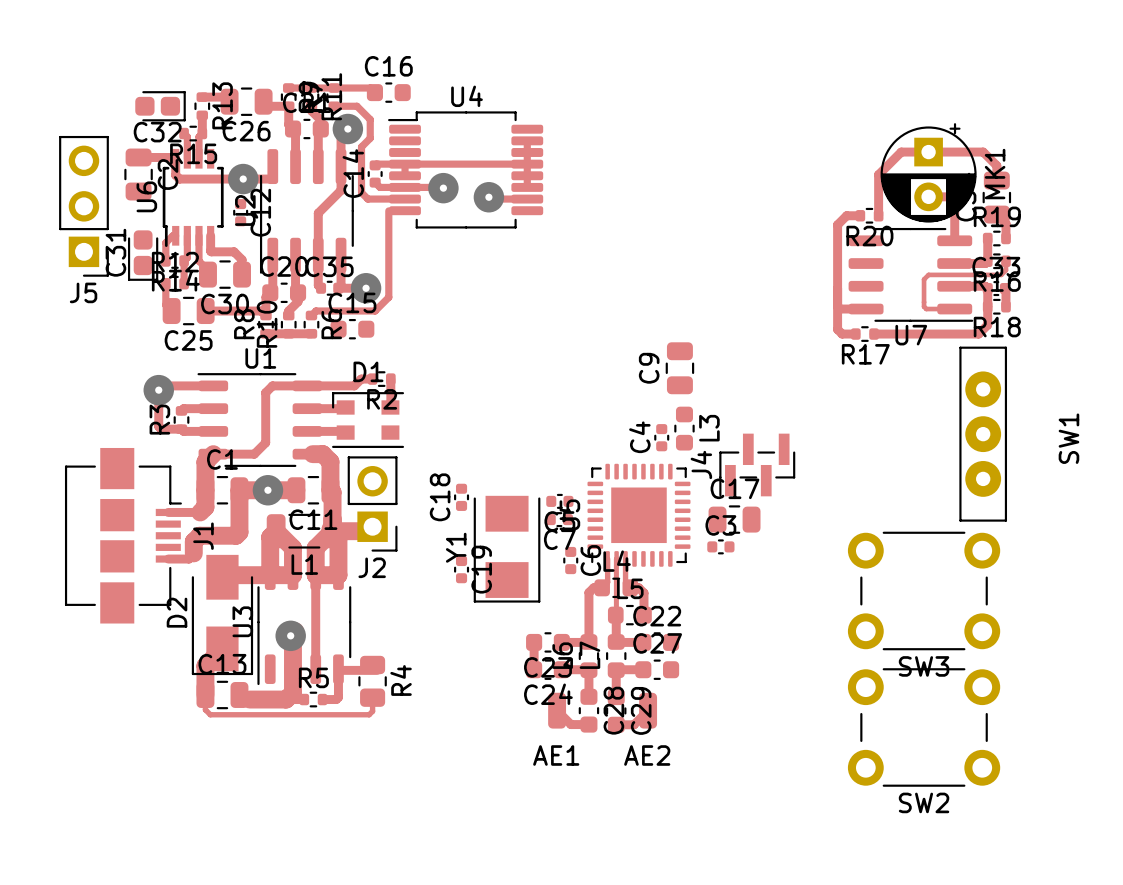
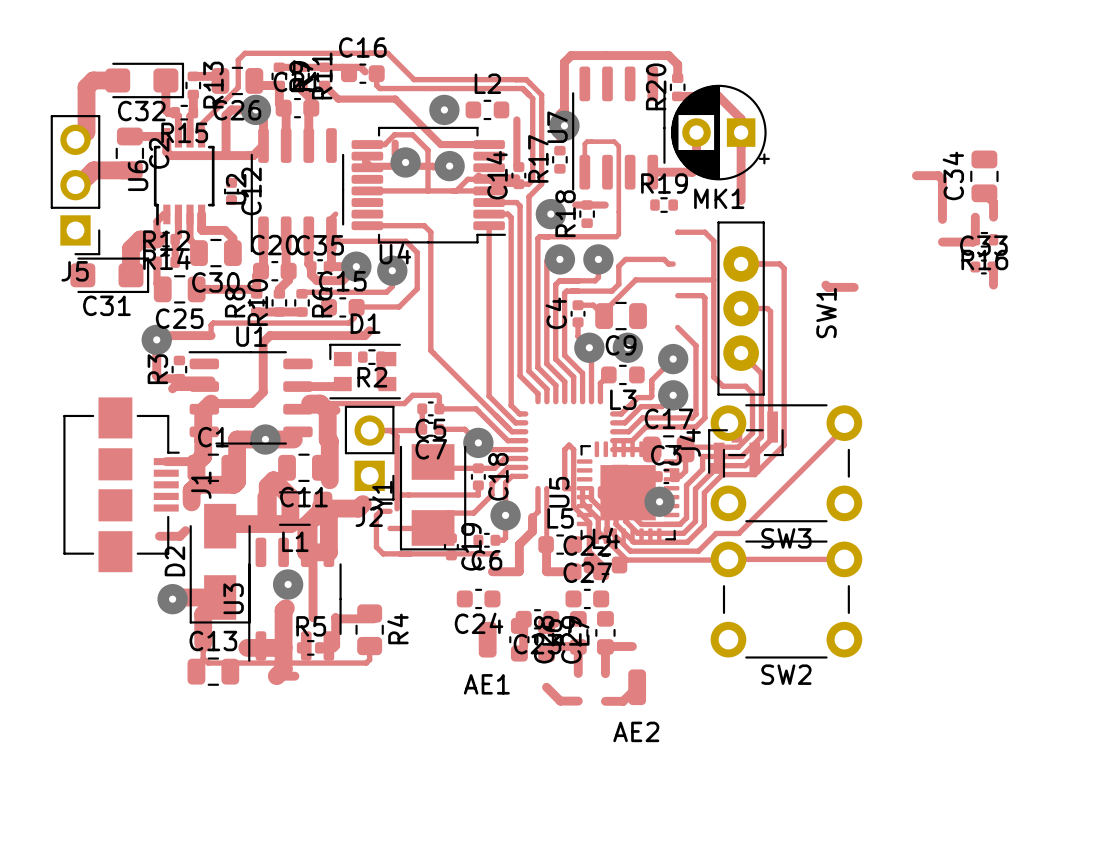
C32 footprint: [135, 91, 186, 122] -> [105, 62, 185, 99]
C16 position: (388, 92) -> (362, 73)
track: none -> (376, 73) (376, 85) (379, 88) (522, 88) (532, 98) (532, 180) (528, 184) (493, 184) (489, 179) (467, 179) (456, 190)
track: none -> (677, 78) (677, 64) (668, 55) (571, 55) (564, 62) (564, 109) (559, 114) (559, 137)
track: none -> (117, 80) (93, 80) (86, 87) (86, 132)
track: none -> (165, 80) (165, 109) (168, 112) (175, 112)
track: (334, 106) (356, 106) (370, 119) (370, 138) (361, 147) (361, 192) (367, 199) (405, 199) -> (324, 85) (338, 99) (395, 99) (440, 144) (489, 144)
track: none -> (677, 96) (718, 96) (741, 118) (741, 200)
track: (347, 129) (341, 135) (341, 190) (318, 213) (318, 255) -> none
via: (347, 129) -> none
via: none -> (255, 109)
via: none -> (444, 109)
L2: none -> (487, 109)
via: none -> (564, 125)
track: none -> (201, 128) (201, 137) (201, 124) (238, 87) (238, 60) (245, 53) (387, 53) (414, 79) (526, 79) (541, 94) (541, 184) (528, 196) (528, 371) (546, 389) (546, 401)
track: (527, 164) (375, 165) -> none
track: none -> (367, 144) (384, 144) (394, 134) (412, 134) (428, 150) (428, 190)
track: none -> (696, 146) (696, 168) (692, 172) (652, 172)
U4 rotation: 0° (465, 169) -> 180° (428, 185)
track: (272, 171) (272, 176) (270, 179) (179, 179) (175, 173) -> (226, 155) (226, 115) (231, 109) (255, 109) (263, 117) (263, 145) (253, 155) (170, 155) (166, 152)
MK1 rotation: 0° (928, 172) -> 90° clockwise (720, 132)
MK1 position: (928, 172) -> (720, 132)
C14 position: (375, 174) -> (518, 175)
via: (243, 179) -> none
track: (996, 180) (996, 165) (983, 152) (901, 152) (878, 174) (878, 215) -> none
via: none -> (405, 162)
via: none -> (449, 166)
via: (443, 188) -> none
track: none -> (131, 170) (93, 170) (86, 177)
track: none -> (584, 172) (584, 143) (587, 141) (614, 141) (618, 146) (618, 234) (616, 236) (539, 236) (537, 238) (537, 367) (555, 385) (555, 401)
via: (488, 197) -> none
track: none -> (495, 184) (489, 190) (367, 190)
track: (388, 210) (388, 297) (375, 310) (315, 310) (313, 313) -> (392, 270) (392, 286) (386, 292) (303, 292)
track: (860, 215) (846, 215) (837, 224) (837, 329) (842, 334) (855, 334) -> none
R20 rotation: 0° (869, 215) -> 90° clockwise (677, 87)
R20 position: (869, 215) -> (677, 87)
track: none -> (489, 202) (516, 202) (520, 205) (520, 375) (537, 393) (537, 401)
track: none -> (575, 205) (605, 205)
C31 footprint: [127, 230, 159, 281] -> [70, 257, 150, 294]
track: none -> (335, 214) (331, 218) (331, 233) (338, 241) (405, 241) (417, 252) (417, 288) (399, 306) (354, 306) (354, 318) (349, 323) (213, 323) (211, 325) (211, 335) (160, 335) (156, 339) (156, 376) (159, 378) (211, 380)
track: none -> (489, 214) (507, 214) (511, 217) (511, 405) (519, 413) (525, 413)
via: none -> (550, 214)
R19 position: (996, 238) -> (664, 205)
track: none -> (367, 225) (424, 225) (430, 232) (430, 350) (512, 431) (525, 431)
track: none -> (489, 225) (489, 396) (515, 422) (525, 422)
C31 name position: C31 (115, 252) -> C31 (106, 305)
track: none -> (677, 232) (704, 232) (713, 241) (713, 377) (722, 386) (745, 386) (752, 393) (752, 433) (738, 447) (687, 447) (685, 449) (685, 471) (680, 476)
track: none -> (157, 239) (140, 239) (130, 248) (130, 275)
track: (1005, 261) (1005, 270) (1001, 274) (928, 274) (924, 279) (924, 306) (926, 309) (954, 309) -> none
U7 rotation: 0° (910, 274) -> 90° clockwise (618, 128)
U7 position: (910, 274) -> (618, 128)
track: none -> (553, 259) (546, 261) (546, 363) (564, 381) (564, 401)
via: none -> (559, 259)
track: none -> (598, 259) (598, 277) (595, 280) (559, 280) (555, 284) (555, 359) (573, 377) (573, 401)
via: none -> (598, 259)
track: none -> (673, 264) (668, 264) (664, 259) (625, 259) (618, 266) (618, 284) (612, 291) (566, 291) (564, 293) (564, 355) (582, 373) (582, 401)
track: none -> (729, 263) (779, 263) (784, 268) (784, 445) (754, 474) (722, 474) (704, 492) (704, 525) (687, 542) (634, 542) (616, 524) (616, 511) (600, 495) (600, 488)
track: (954, 286) (985, 286) (987, 288) (987, 324) (978, 334) (874, 334) -> none
track: none -> (311, 266) (311, 275) (317, 280) (342, 280) (352, 270)
via: none -> (392, 270)
track: none -> (713, 279) (635, 279) (604, 311) (604, 316)
R18 rotation: 0° (996, 306) -> 90° clockwise (587, 214)
R18 position: (996, 306) -> (587, 214)
track: none -> (677, 295) (702, 295) (704, 297) (704, 417) (695, 427) (645, 427) (632, 440) (612, 440)
track: none -> (578, 305) (593, 305) (601, 313)
track: none -> (729, 308) (767, 308) (770, 311) (770, 440) (745, 465) (711, 465) (711, 473) (695, 489) (695, 521) (683, 533) (637, 533) (625, 521) (625, 479) (622, 476) (612, 476)
R17 rotation: 0° (864, 334) -> 90° clockwise (559, 159)
R17 position: (864, 334) -> (559, 159)
track: none -> (578, 322) (578, 336) (591, 349) (591, 401)
track: none -> (677, 327) (695, 345) (695, 414) (692, 417) (642, 417) (628, 431) (612, 431)
track: none -> (369, 330) (364, 335) (270, 335) (263, 342) (263, 392) (251, 403) (216, 403)
C9 name position: C9 (649, 368) -> C9 (621, 345)
C9 rotation: 0° (679, 368) -> 90° clockwise (621, 316)
C9 position: (679, 368) -> (621, 316)
via: none -> (589, 347)
via: none -> (627, 347)
track: none -> (741, 353) (761, 373) (761, 436) (741, 456) (702, 456) (702, 469) (686, 485) (686, 517) (679, 524) (641, 524) (634, 517) (634, 475) (626, 467) (612, 467)
track: (372, 379) (361, 379) (354, 385) (272, 385) (265, 392) (265, 442) (254, 454) (218, 454) -> none
track: none -> (673, 359) (651, 380) (650, 397) (637, 397) (621, 413) (612, 413)
via: none -> (673, 359)
track: (213, 385) (163, 385) (158, 390) (158, 426) (161, 429) (213, 431) -> none
via position: (158, 390) -> (156, 339)
track: none -> (608, 374) (600, 383) (600, 401)
track: none -> (673, 395) (661, 406) (641, 406) (624, 422) (612, 422)
via: none -> (673, 395)
R3 position: (181, 420) -> (179, 369)
D1 position: (368, 420) -> (365, 371)
track: none -> (304, 403) (404, 403) (412, 395) (437, 395) (439, 397) (439, 408) (476, 408) (507, 440) (525, 440)
L3 rotation: 0° (684, 428) -> 90° clockwise (622, 374)
L3 position: (684, 428) -> (622, 374)
track: none -> (422, 408) (421, 430) (369, 430)
SW1 position: (983, 434) -> (741, 308)
C4 position: (661, 437) -> (578, 313)
track: none -> (844, 423) (844, 427) (738, 533) (716, 533) (698, 551) (630, 551) (607, 527) (607, 515) (591, 499) (591, 488)
track: none -> (439, 429) (464, 429) (485, 449) (525, 449)
track: none -> (391, 430) (397, 436) (397, 508)
track: (213, 454) (205, 462) (205, 507) (200, 512) (168, 512) -> (211, 403) (203, 411) (203, 456) (198, 461) (166, 461)
track: (312, 454) (322, 454) (330, 461) (332, 531) -> (310, 403) (320, 403) (327, 411) (329, 480)
via: none -> (478, 442)
track: none -> (612, 449) (647, 449)
track: none -> (525, 458) (504, 458) (494, 468) (439, 468) (433, 461)
track: none -> (525, 467) (508, 467) (491, 483) (491, 494) (473, 513) (447, 513) (432, 528) (390, 528)
via position: (267, 490) -> (265, 439)
track: (296, 490) (239, 490) (239, 532) (236, 535) (199, 535) (193, 541) (193, 553) -> (293, 439) (237, 439) (237, 481) (233, 484) (197, 484) (191, 490) (191, 502)
C18 name position: C18 (440, 497) -> C18 (498, 476)
C18 position: (461, 497) -> (478, 476)
track: none -> (525, 476) (511, 476) (505, 482) (505, 538) (503, 540) (495, 540)
C5 position: (559, 501) -> (430, 408)
J2 position: (372, 503) -> (369, 453)
track: none -> (478, 485) (478, 494) (401, 494) (397, 499)
track: none -> (537, 488) (537, 511) (532, 517) (532, 531) (519, 544) (519, 571) (492, 571)
track: none -> (573, 488) (564, 488) (564, 449) (569, 445) (573, 449) (573, 506) (589, 522) (589, 551) (601, 563) (601, 571)
track: none -> (582, 488) (582, 503) (598, 518) (598, 531) (626, 560) (844, 559)
C7 position: (559, 519) -> (430, 429)
C17 position: (734, 519) -> (668, 449)
via: none -> (659, 501)
track: none -> (390, 511) (380, 511) (376, 515) (376, 547) (383, 553) (496, 553)
J1 position: (123, 535) -> (121, 484)
via: none -> (505, 515)
C3 position: (720, 546) -> (666, 476)
Y1 position: (507, 549) -> (433, 497)
track: (607, 558) (607, 582) (602, 587) (593, 587) (588, 592) (588, 641) (561, 642) -> none
track: (625, 558) (625, 583) (630, 587) (638, 587) (643, 593) (643, 615) -> none
track: (616, 559) (616, 641) (643, 642) -> (546, 488) (546, 571) (573, 571)
C6 rotation: 0° (570, 560) -> 90° clockwise (486, 540)
C6 position: (570, 560) -> (486, 540)
track: (222, 572) (224, 575) (292, 575) (292, 548) (276, 531) (270, 537) (270, 575) -> (220, 521) (222, 524) (290, 524) (290, 497) (273, 480) (267, 486) (267, 524)
track: (315, 575) (315, 669) -> (313, 524) (313, 617)
SW3 position: (924, 590) -> (786, 463)
D2 position: (222, 614) -> (220, 563)
L5 position: (629, 615) -> (560, 544)
track: none -> (172, 599) (174, 597) (220, 597) (203, 614) (203, 658) (208, 663) (366, 663) (369, 659) (369, 646)
via: none -> (172, 599)
via position: (290, 635) -> (288, 584)
C22 position: (657, 642) -> (587, 571)
track: (222, 648) (205, 665) (205, 709) (210, 714) (369, 714) (372, 711) (372, 697) -> none
C24 position: (547, 669) -> (478, 598)
C27 position: (657, 669) -> (587, 598)
track: (377, 670) (338, 669) (338, 697) (336, 699) (322, 699) -> (374, 618) (335, 617) (335, 645) (333, 647) (319, 647)
R4 position: (372, 681) -> (369, 629)
track: (249, 699) (286, 699) -> (247, 647) (283, 647)
R5 position: (313, 699) -> (310, 647)
AE1 position: (557, 710) -> (487, 639)
C28 position: (588, 710) -> (519, 639)
C29 position: (616, 710) -> (546, 639)
SW2 position: (924, 727) -> (786, 599)

